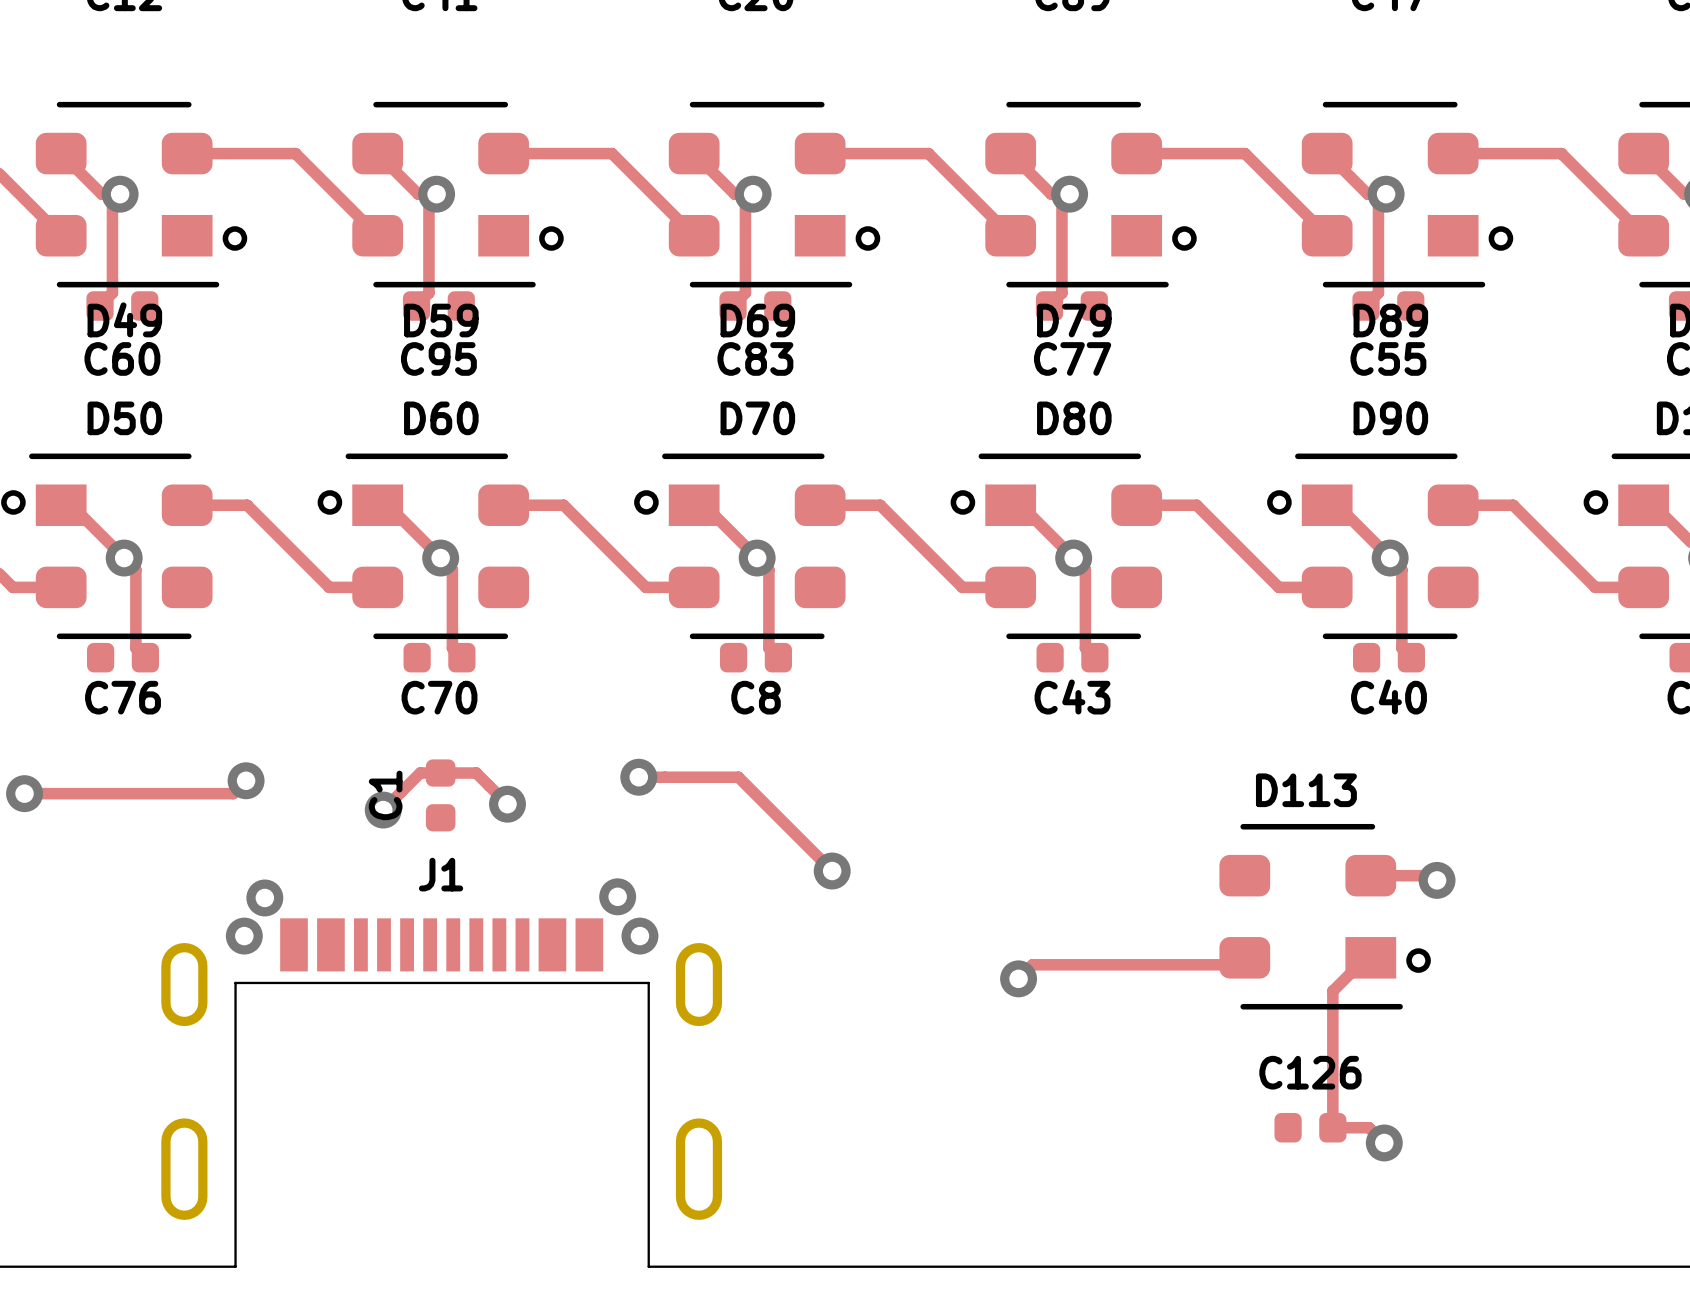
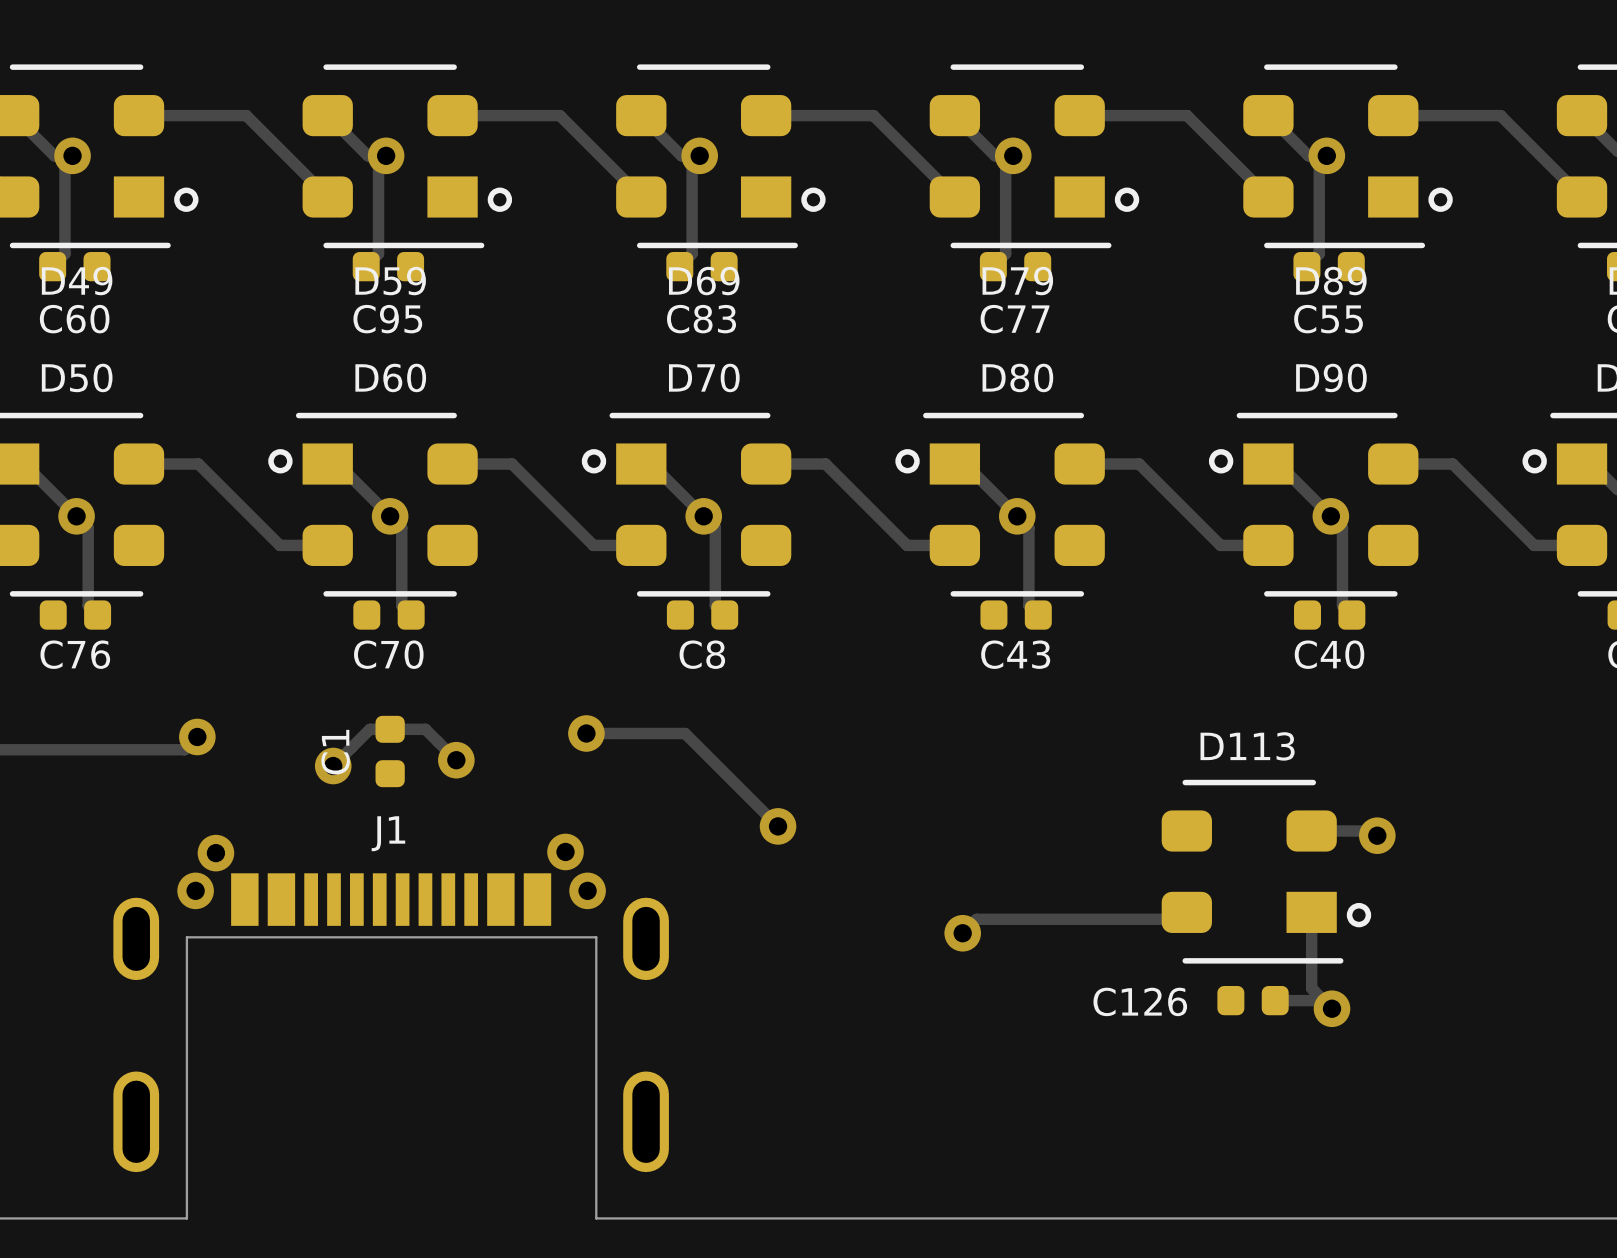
track: (1370, 957) (1366, 957) (1332, 991) (1332, 1127) (1369, 1127) (1384, 1142) -> (1311, 912) (1311, 988) (1332, 1008)
track: none -> (1275, 1000) (1323, 1000)
C126 name position: C126 (1310, 1072) -> C126 (1140, 1001)
C126 position: (1310, 1127) -> (1253, 1000)
via position: (1384, 1142) -> (1332, 1008)

